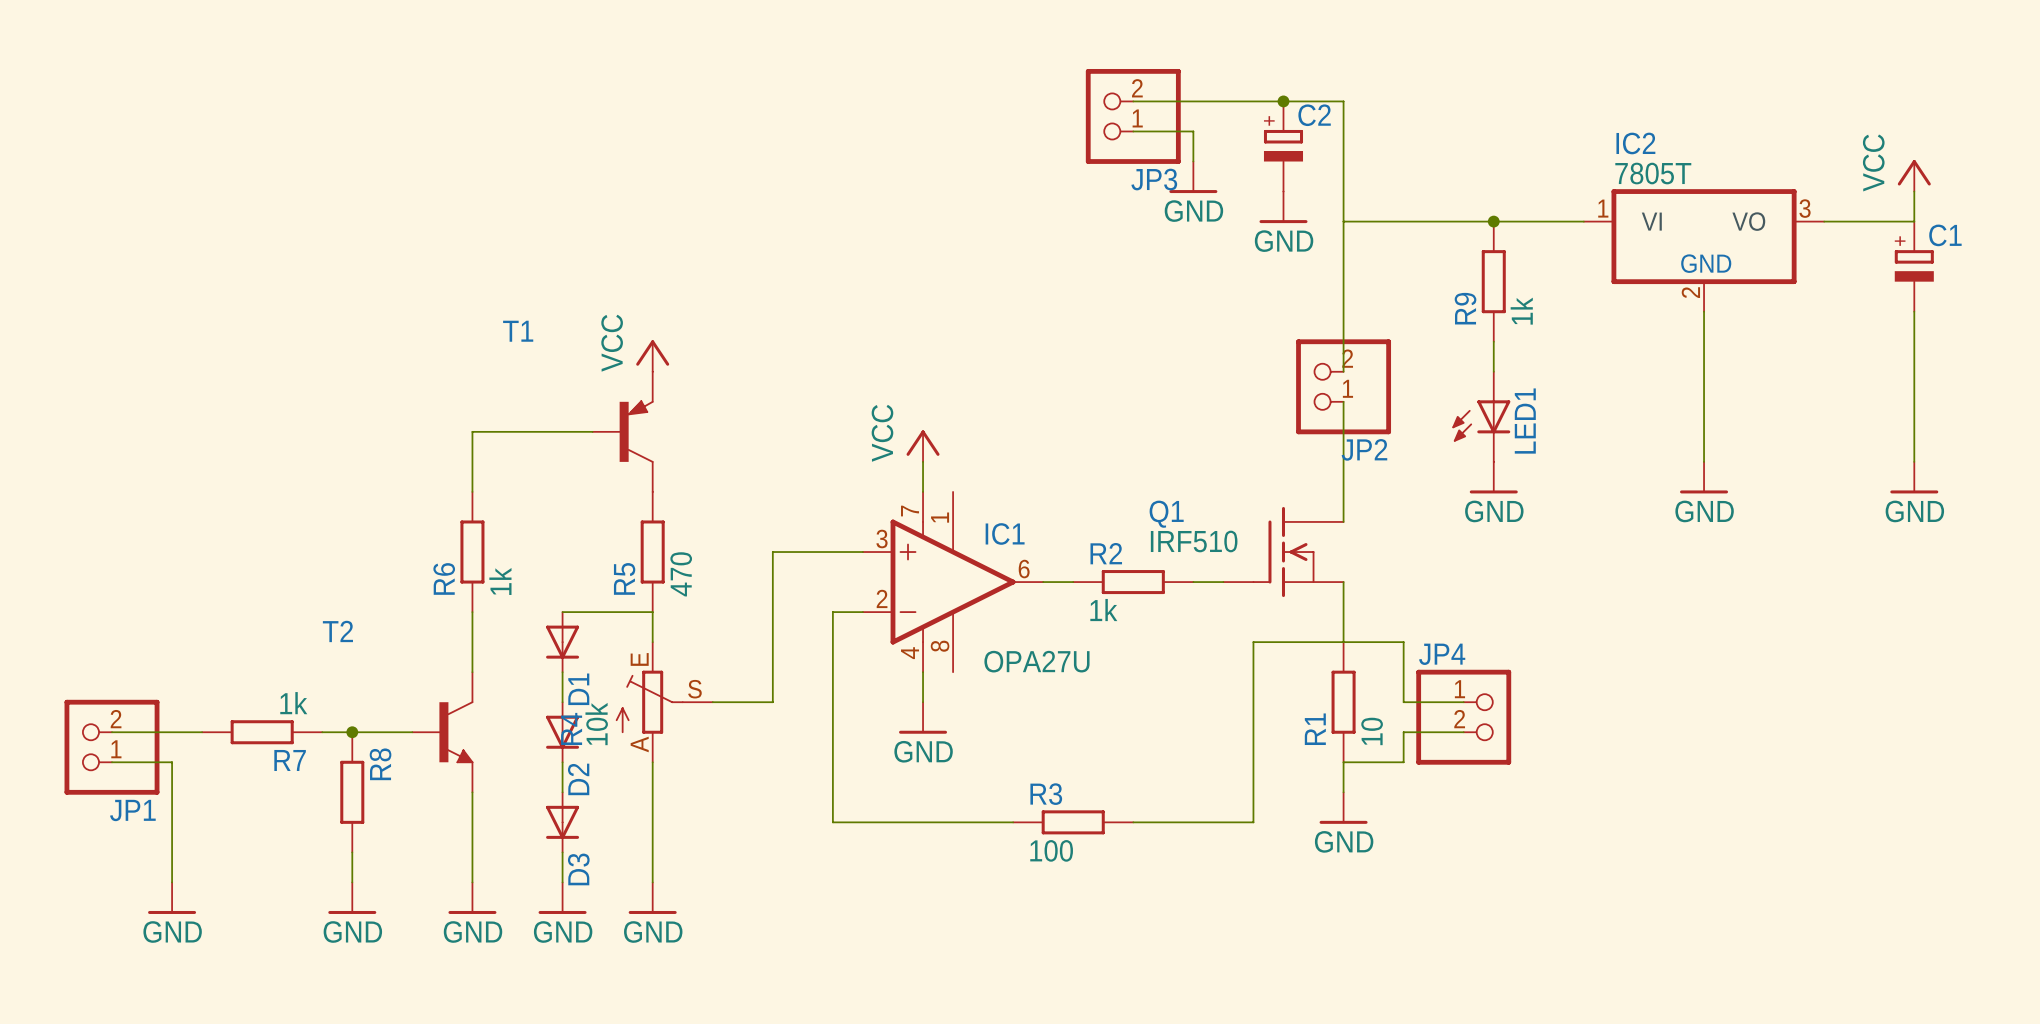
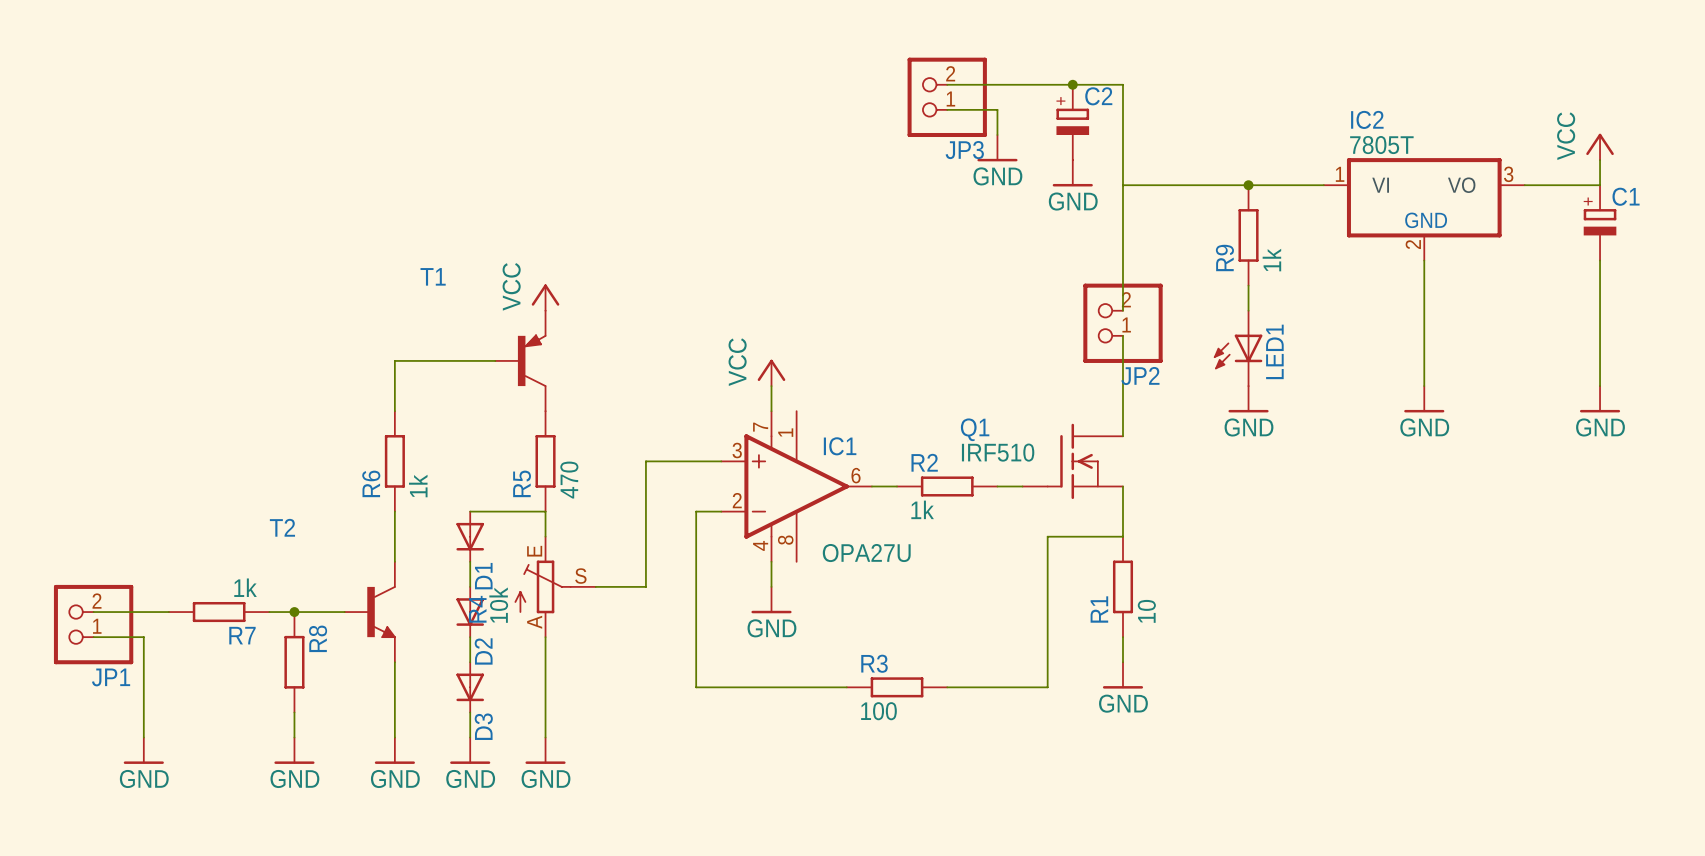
wire: (1343, 642) (1403, 642) (1403, 702) (1463, 702) -> none
JP4: (1463, 717) -> none
wire: (1463, 732) (1403, 732) (1403, 762) (1343, 762) -> none

